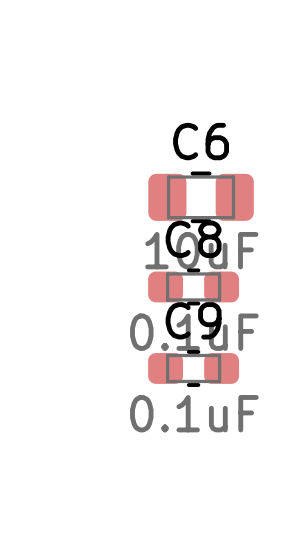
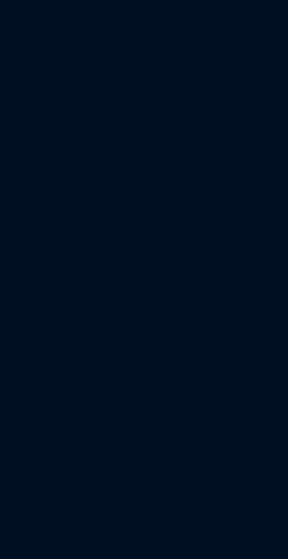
C6: 10uF (201, 197) -> none
C8: 0.1uF (193, 286) -> none
C9: 0.1uF (193, 368) -> none

